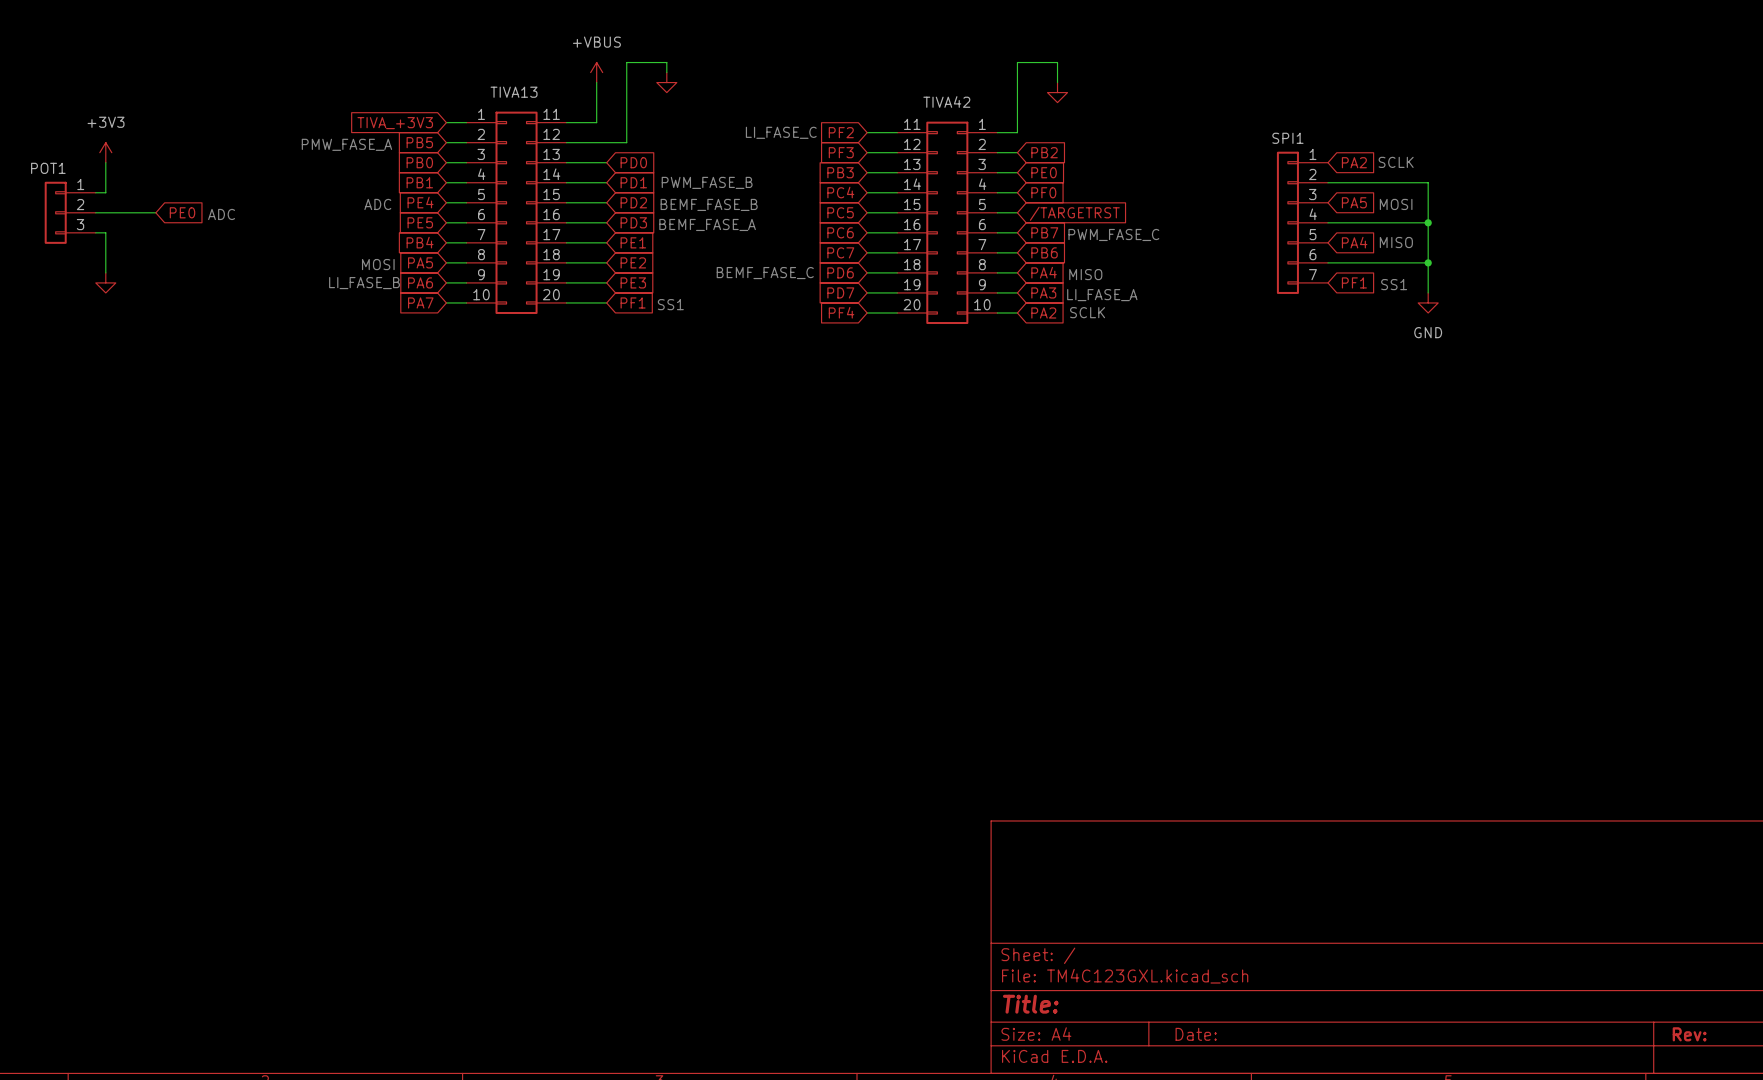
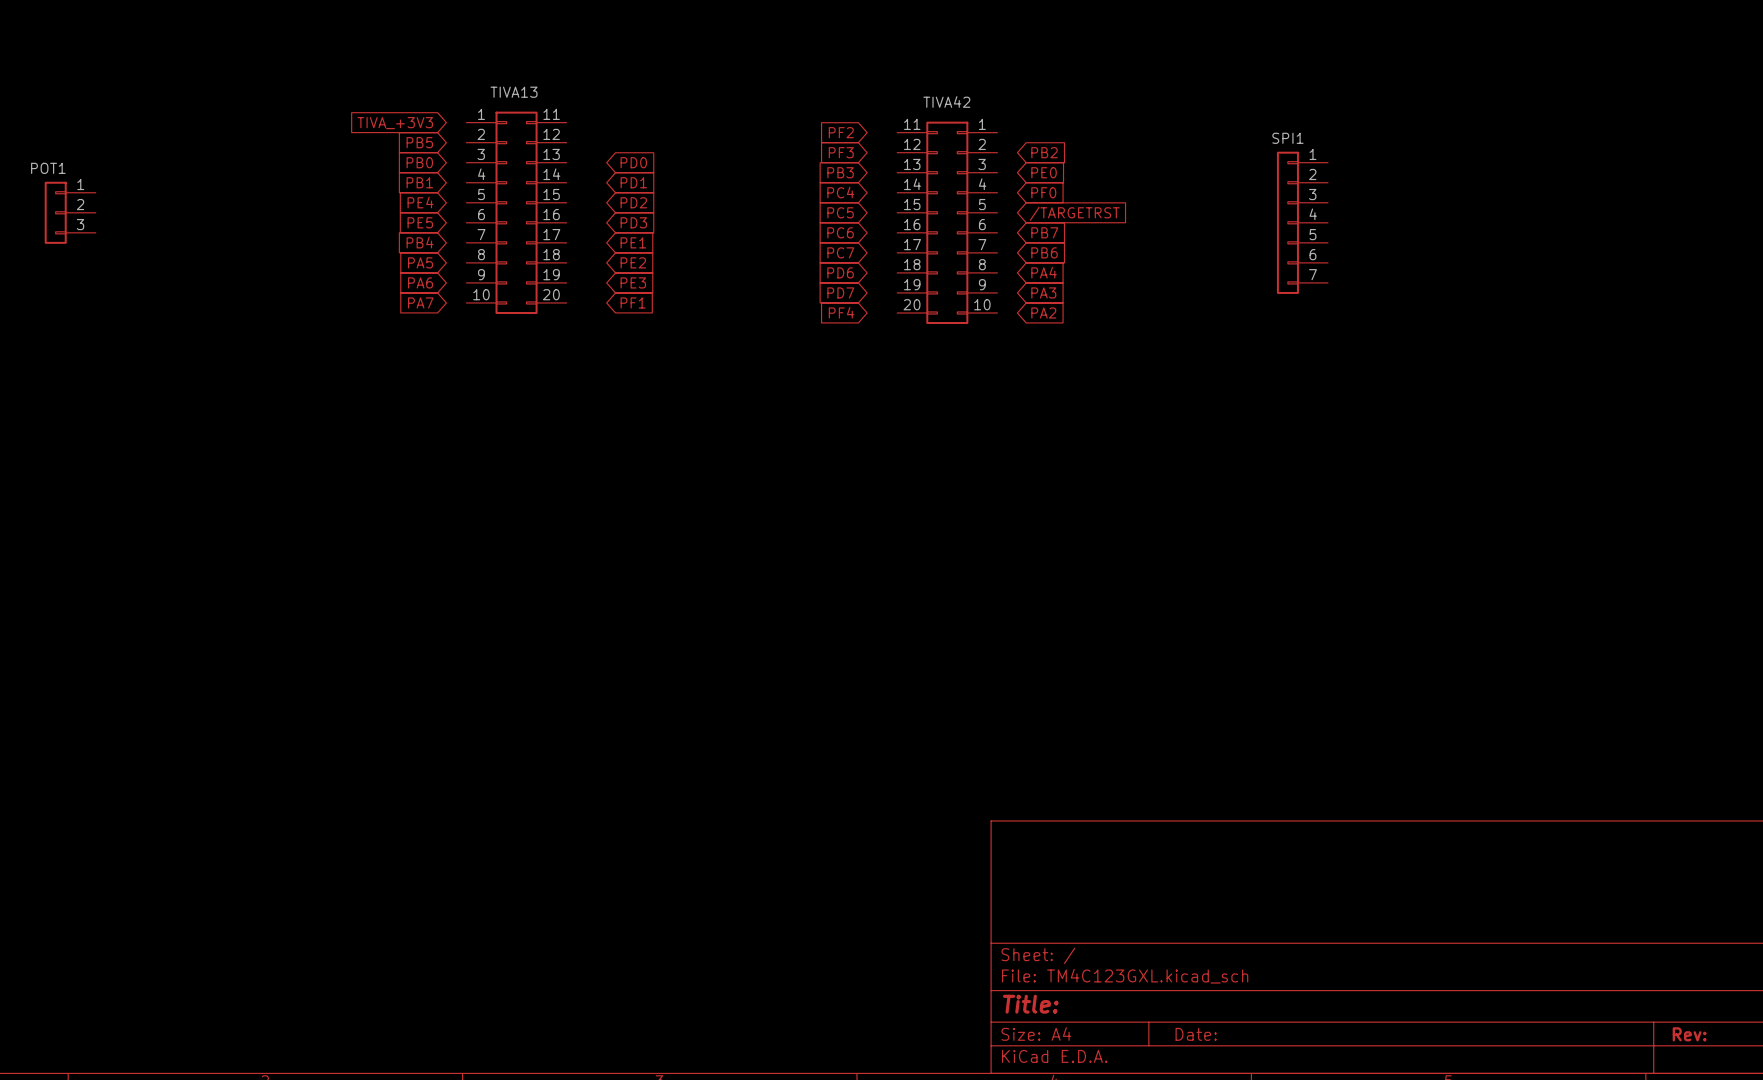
power symbol: +VBUS (596, 72) -> none
wire: (666, 72) (666, 62) (626, 62) (626, 142) (566, 142) -> none
wire: (596, 82) (596, 122) (566, 122) -> none
power symbol: (666, 82) -> none
wire: (1057, 82) (1057, 62) (1017, 62) (1017, 132) (997, 132) -> none
power symbol: (1057, 92) -> none
wire: (446, 122) (466, 122) -> none
text: LI_FASE_C (781, 132) -> none
wire: (867, 132) (897, 132) -> none
wire: (446, 142) (466, 142) -> none
text: PMW_FASE_A (346, 144) -> none
power symbol: +3V3 (105, 152) -> none
wire: (867, 152) (897, 152) -> none
wire: (997, 152) (1017, 152) -> none
wire: (105, 162) (105, 192) (95, 192) -> none
wire: (446, 162) (466, 162) -> none
wire: (566, 162) (606, 162) -> none
global label: PA2 (1354, 162) -> none
text: SCLK (1396, 162) -> none
wire: (867, 172) (897, 172) -> none
wire: (997, 172) (1017, 172) -> none
wire: (446, 182) (466, 182) -> none
wire: (566, 182) (606, 182) -> none
text: PWM_FASE_B (707, 182) -> none
wire: (1328, 182) (1428, 182) (1428, 292) -> none
wire: (867, 192) (897, 192) -> none
wire: (997, 192) (1017, 192) -> none
wire: (446, 202) (466, 202) -> none
wire: (566, 202) (606, 202) -> none
global label: PA5 (1354, 202) -> none
text: ADC (377, 204) -> none
text: BEMF_FASE_B (709, 204) -> none
text: MOSI (1396, 204) -> none
wire: (95, 212) (155, 212) -> none
global label: PE0 (182, 212) -> none
wire: (867, 212) (897, 212) -> none
wire: (997, 212) (1017, 212) -> none
text: ADC (221, 214) -> none
wire: (446, 222) (466, 222) -> none
wire: (566, 222) (606, 222) -> none
wire: (1328, 222) (1428, 222) -> none
junction: (1428, 222) -> none
text: BEMF_FASE_A (707, 224) -> none
wire: (95, 232) (105, 232) (105, 272) -> none
wire: (867, 232) (897, 232) -> none
wire: (997, 232) (1017, 232) -> none
text: PWM_FASE_C (1113, 234) -> none
wire: (446, 242) (466, 242) -> none
wire: (566, 242) (606, 242) -> none
global label: PA4 (1354, 242) -> none
text: MISO (1396, 242) -> none
wire: (867, 252) (897, 252) -> none
wire: (997, 252) (1017, 252) -> none
wire: (446, 262) (466, 262) -> none
wire: (566, 262) (606, 262) -> none
wire: (1328, 262) (1428, 262) -> none
junction: (1428, 262) -> none
text: MOSI (378, 264) -> none
wire: (867, 272) (897, 272) -> none
wire: (997, 272) (1017, 272) -> none
text: BEMF_FASE_C (765, 273) -> none
text: MISO (1085, 274) -> none
power symbol: (105, 282) -> none
wire: (446, 282) (466, 282) -> none
wire: (566, 282) (606, 282) -> none
global label: PF1 (1354, 282) -> none
text: LI_FASE_B (364, 283) -> none
text: SS1 (1394, 284) -> none
wire: (867, 292) (897, 292) -> none
wire: (997, 292) (1017, 292) -> none
text: LI_FASE_A (1102, 295) -> none
wire: (446, 302) (466, 302) -> none
wire: (566, 302) (606, 302) -> none
power symbol: GND (1428, 302) -> none
text: SS1 (670, 304) -> none
wire: (867, 312) (897, 312) -> none
wire: (997, 312) (1017, 312) -> none
text: SCLK (1087, 312) -> none

